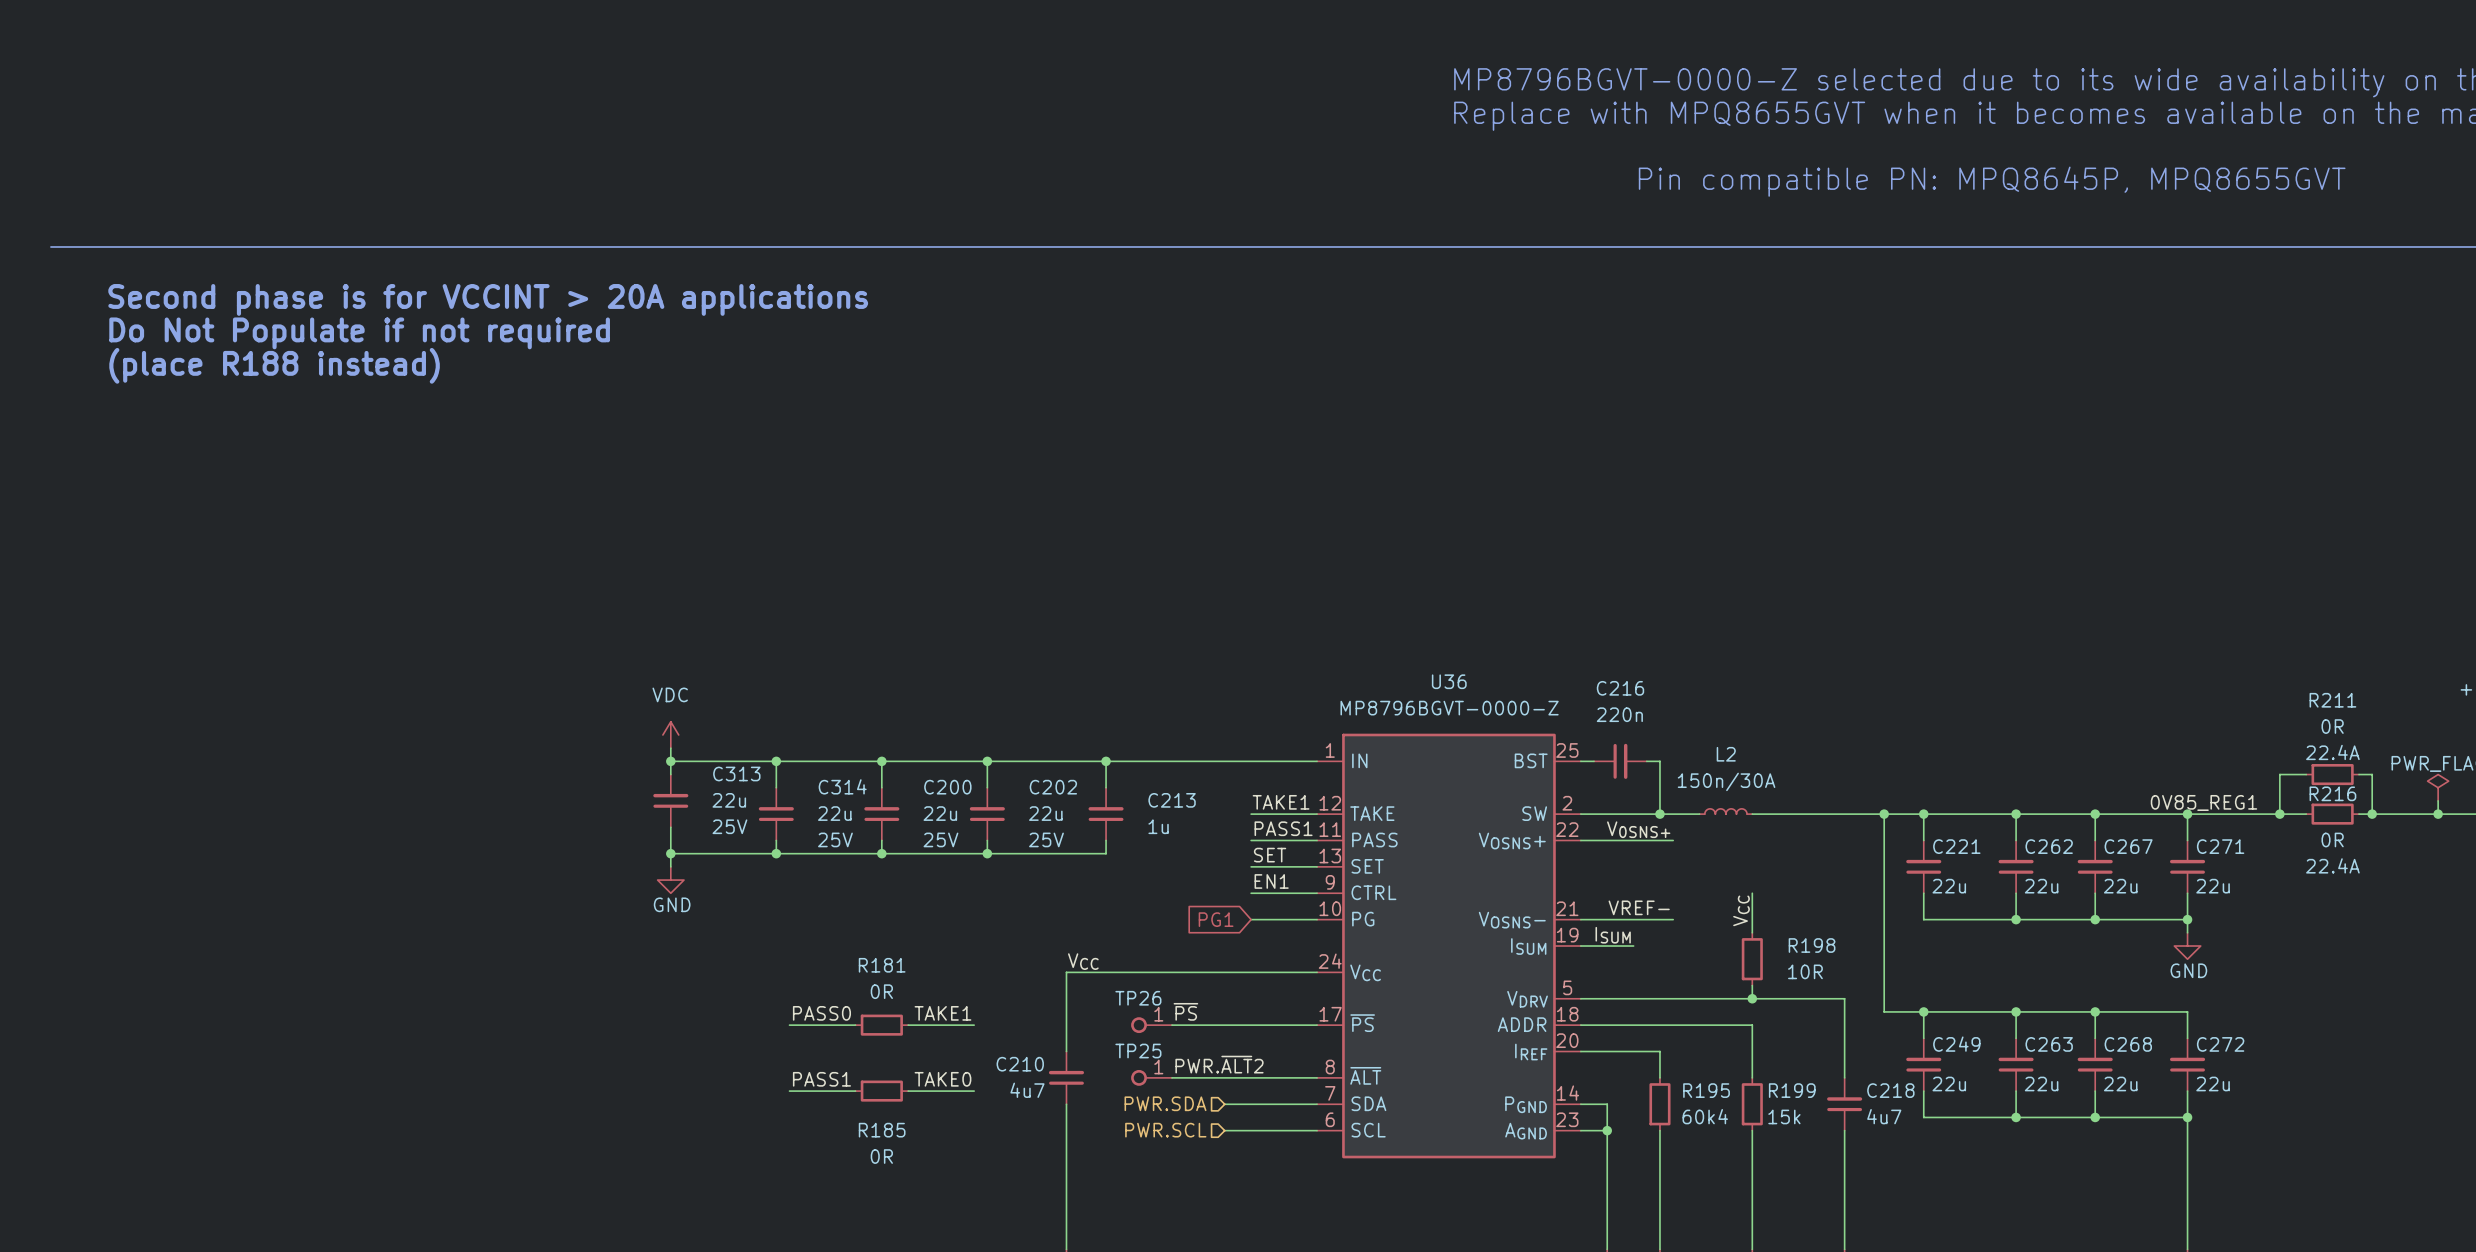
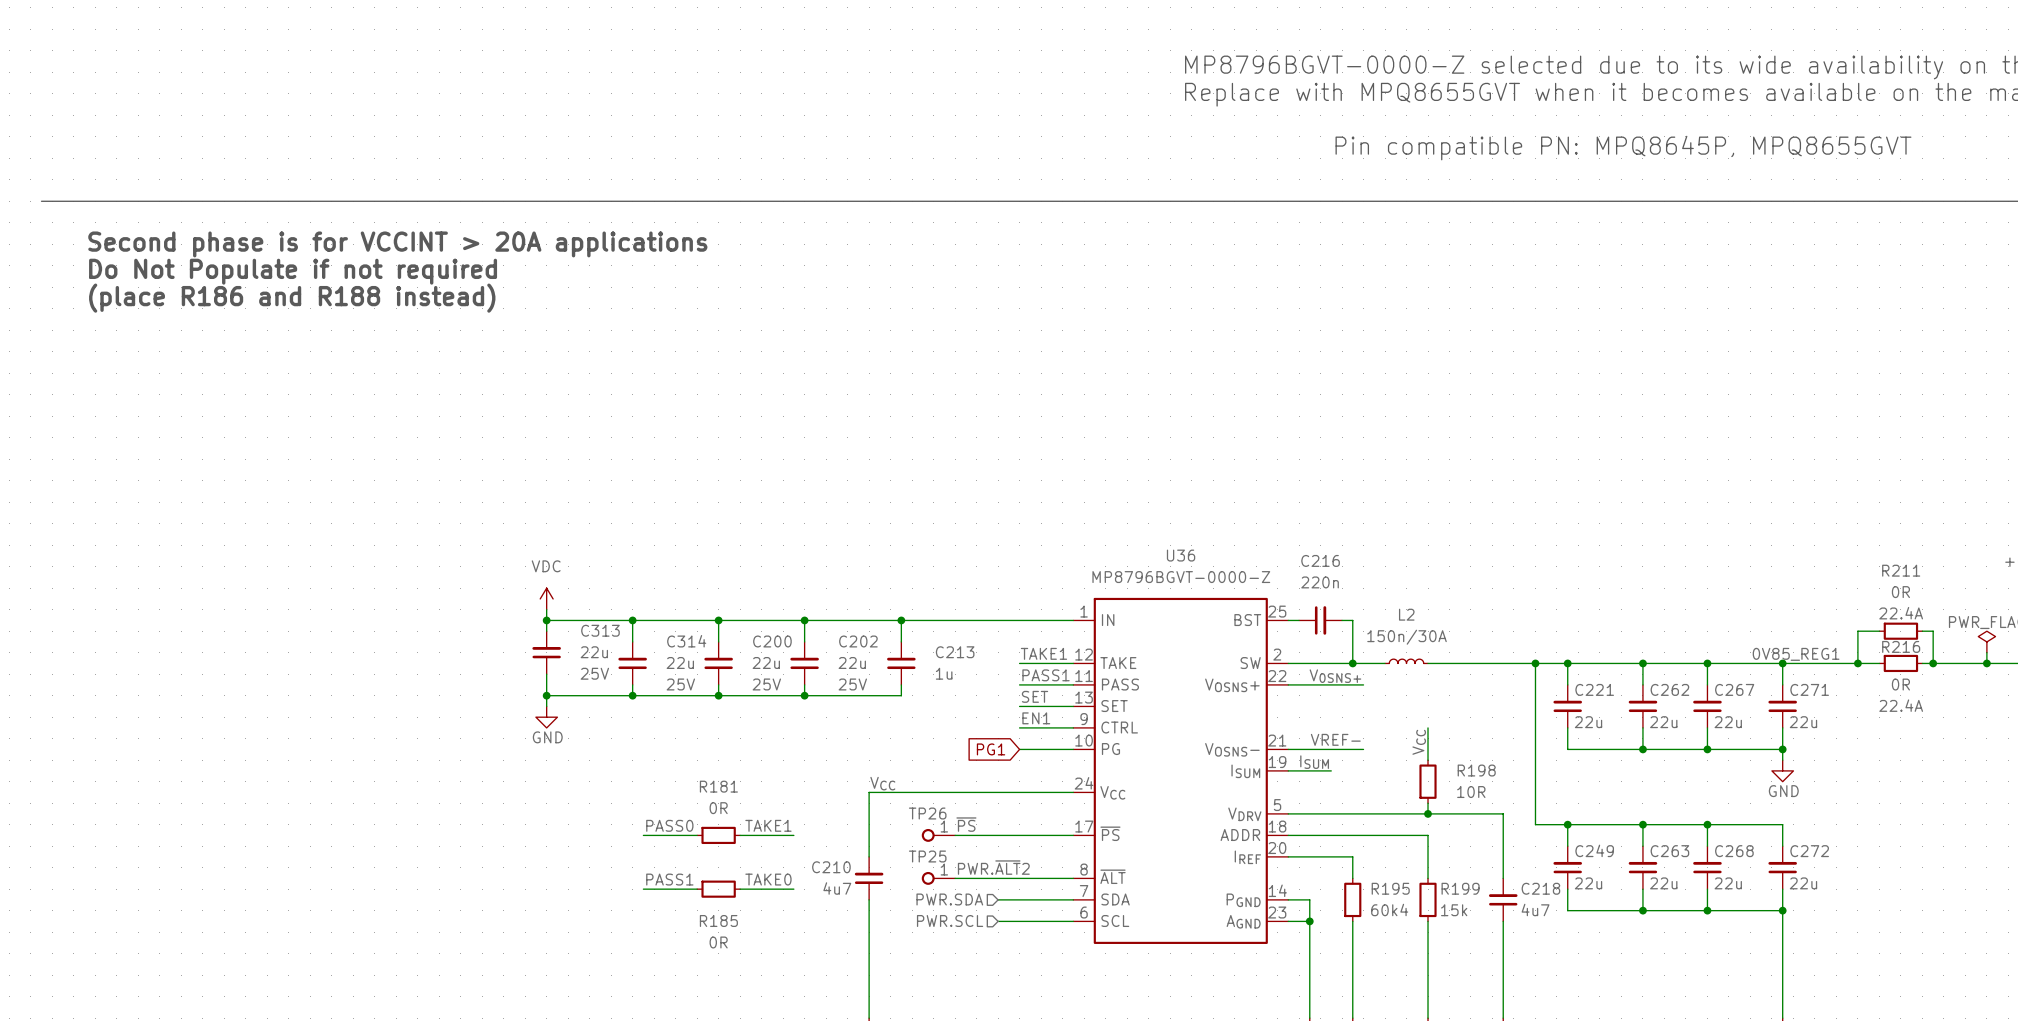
text: (place R188 instead) (274, 365) -> (place R186 and R188 instead) (292, 298)

